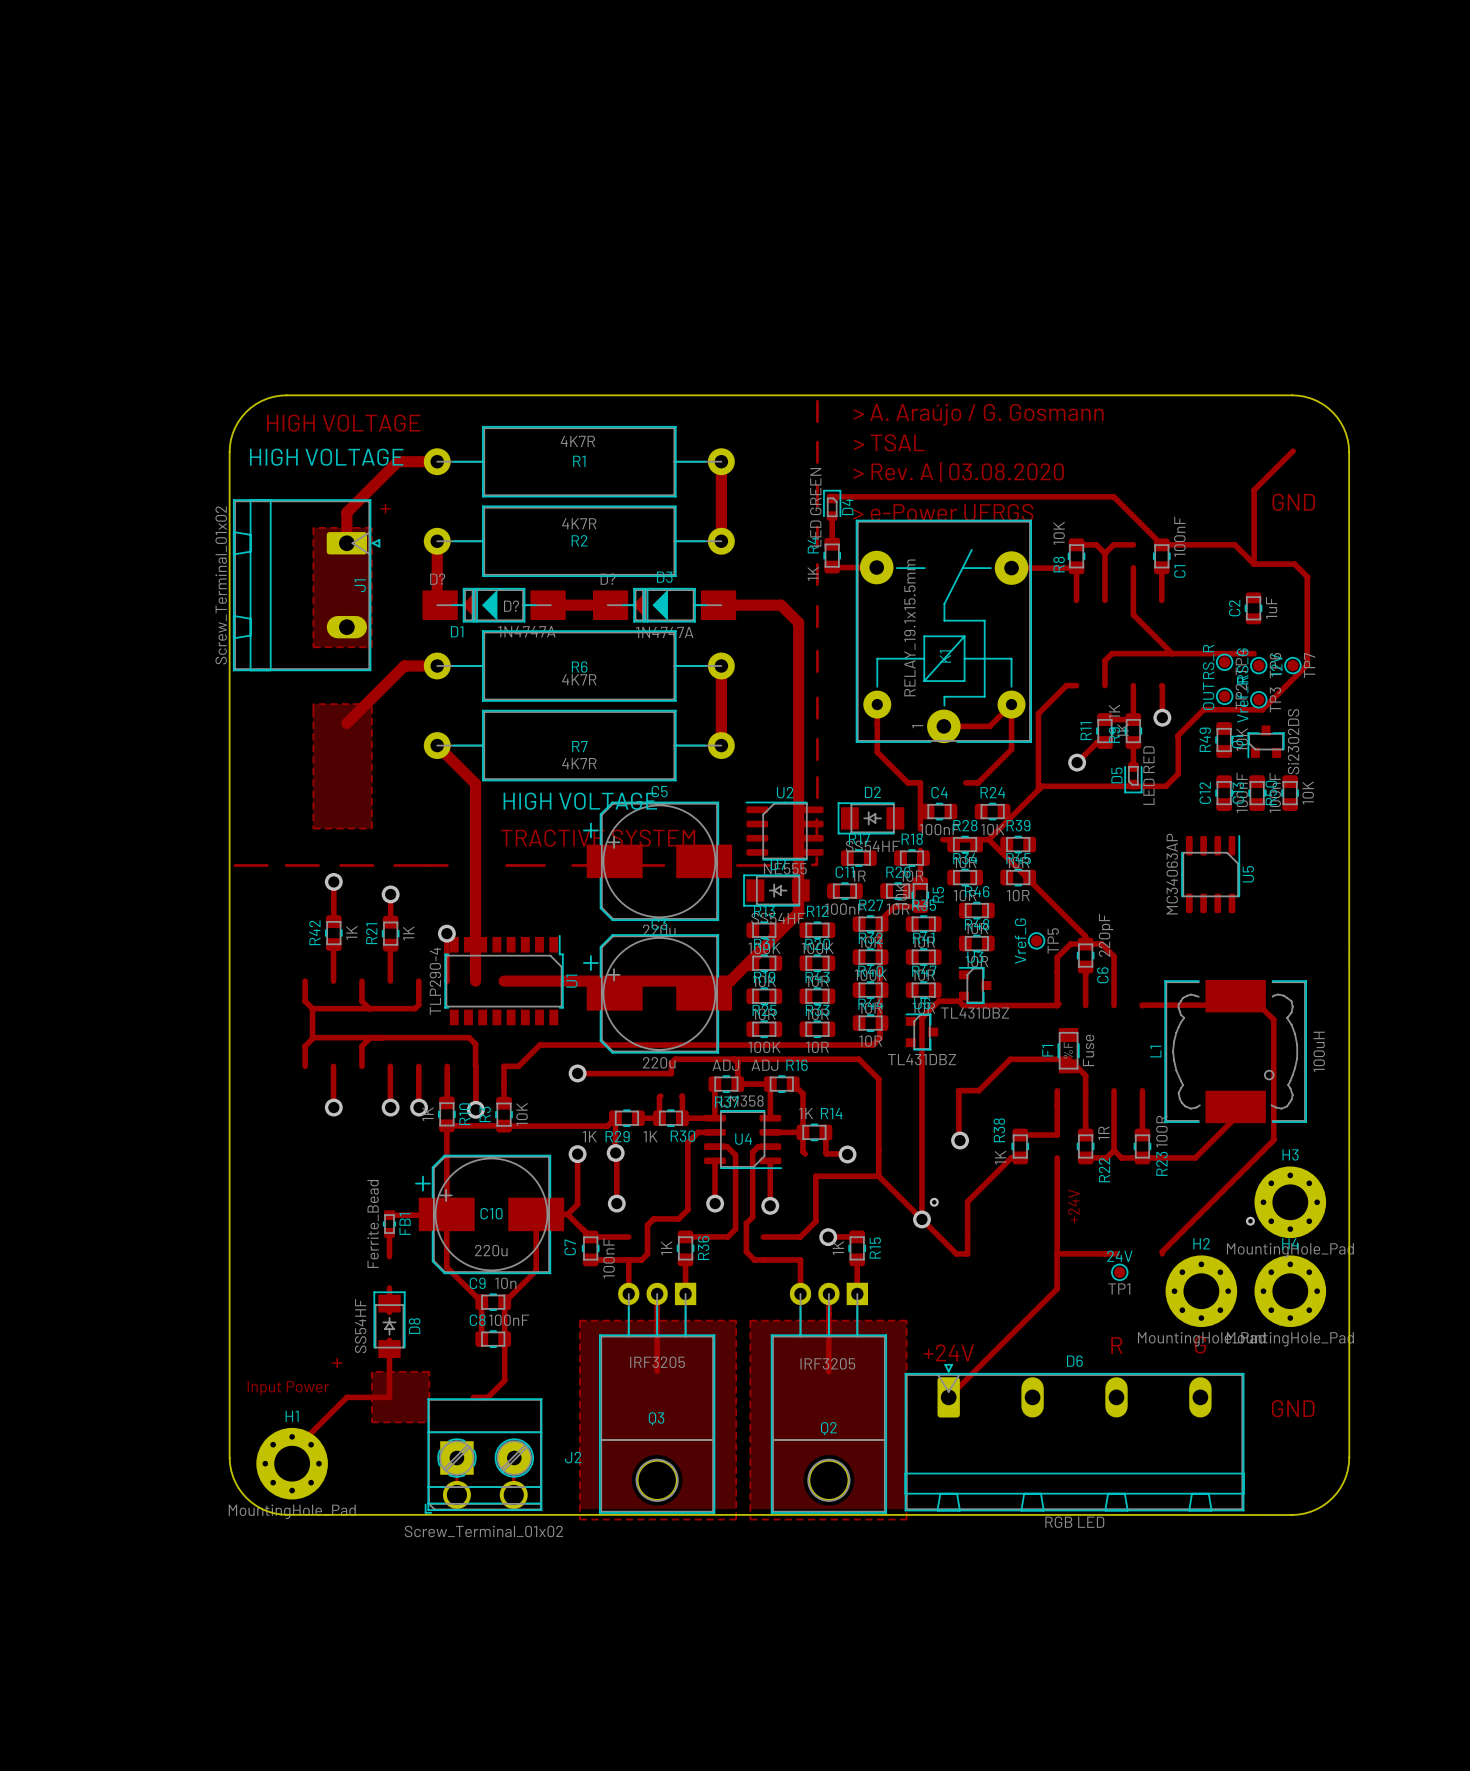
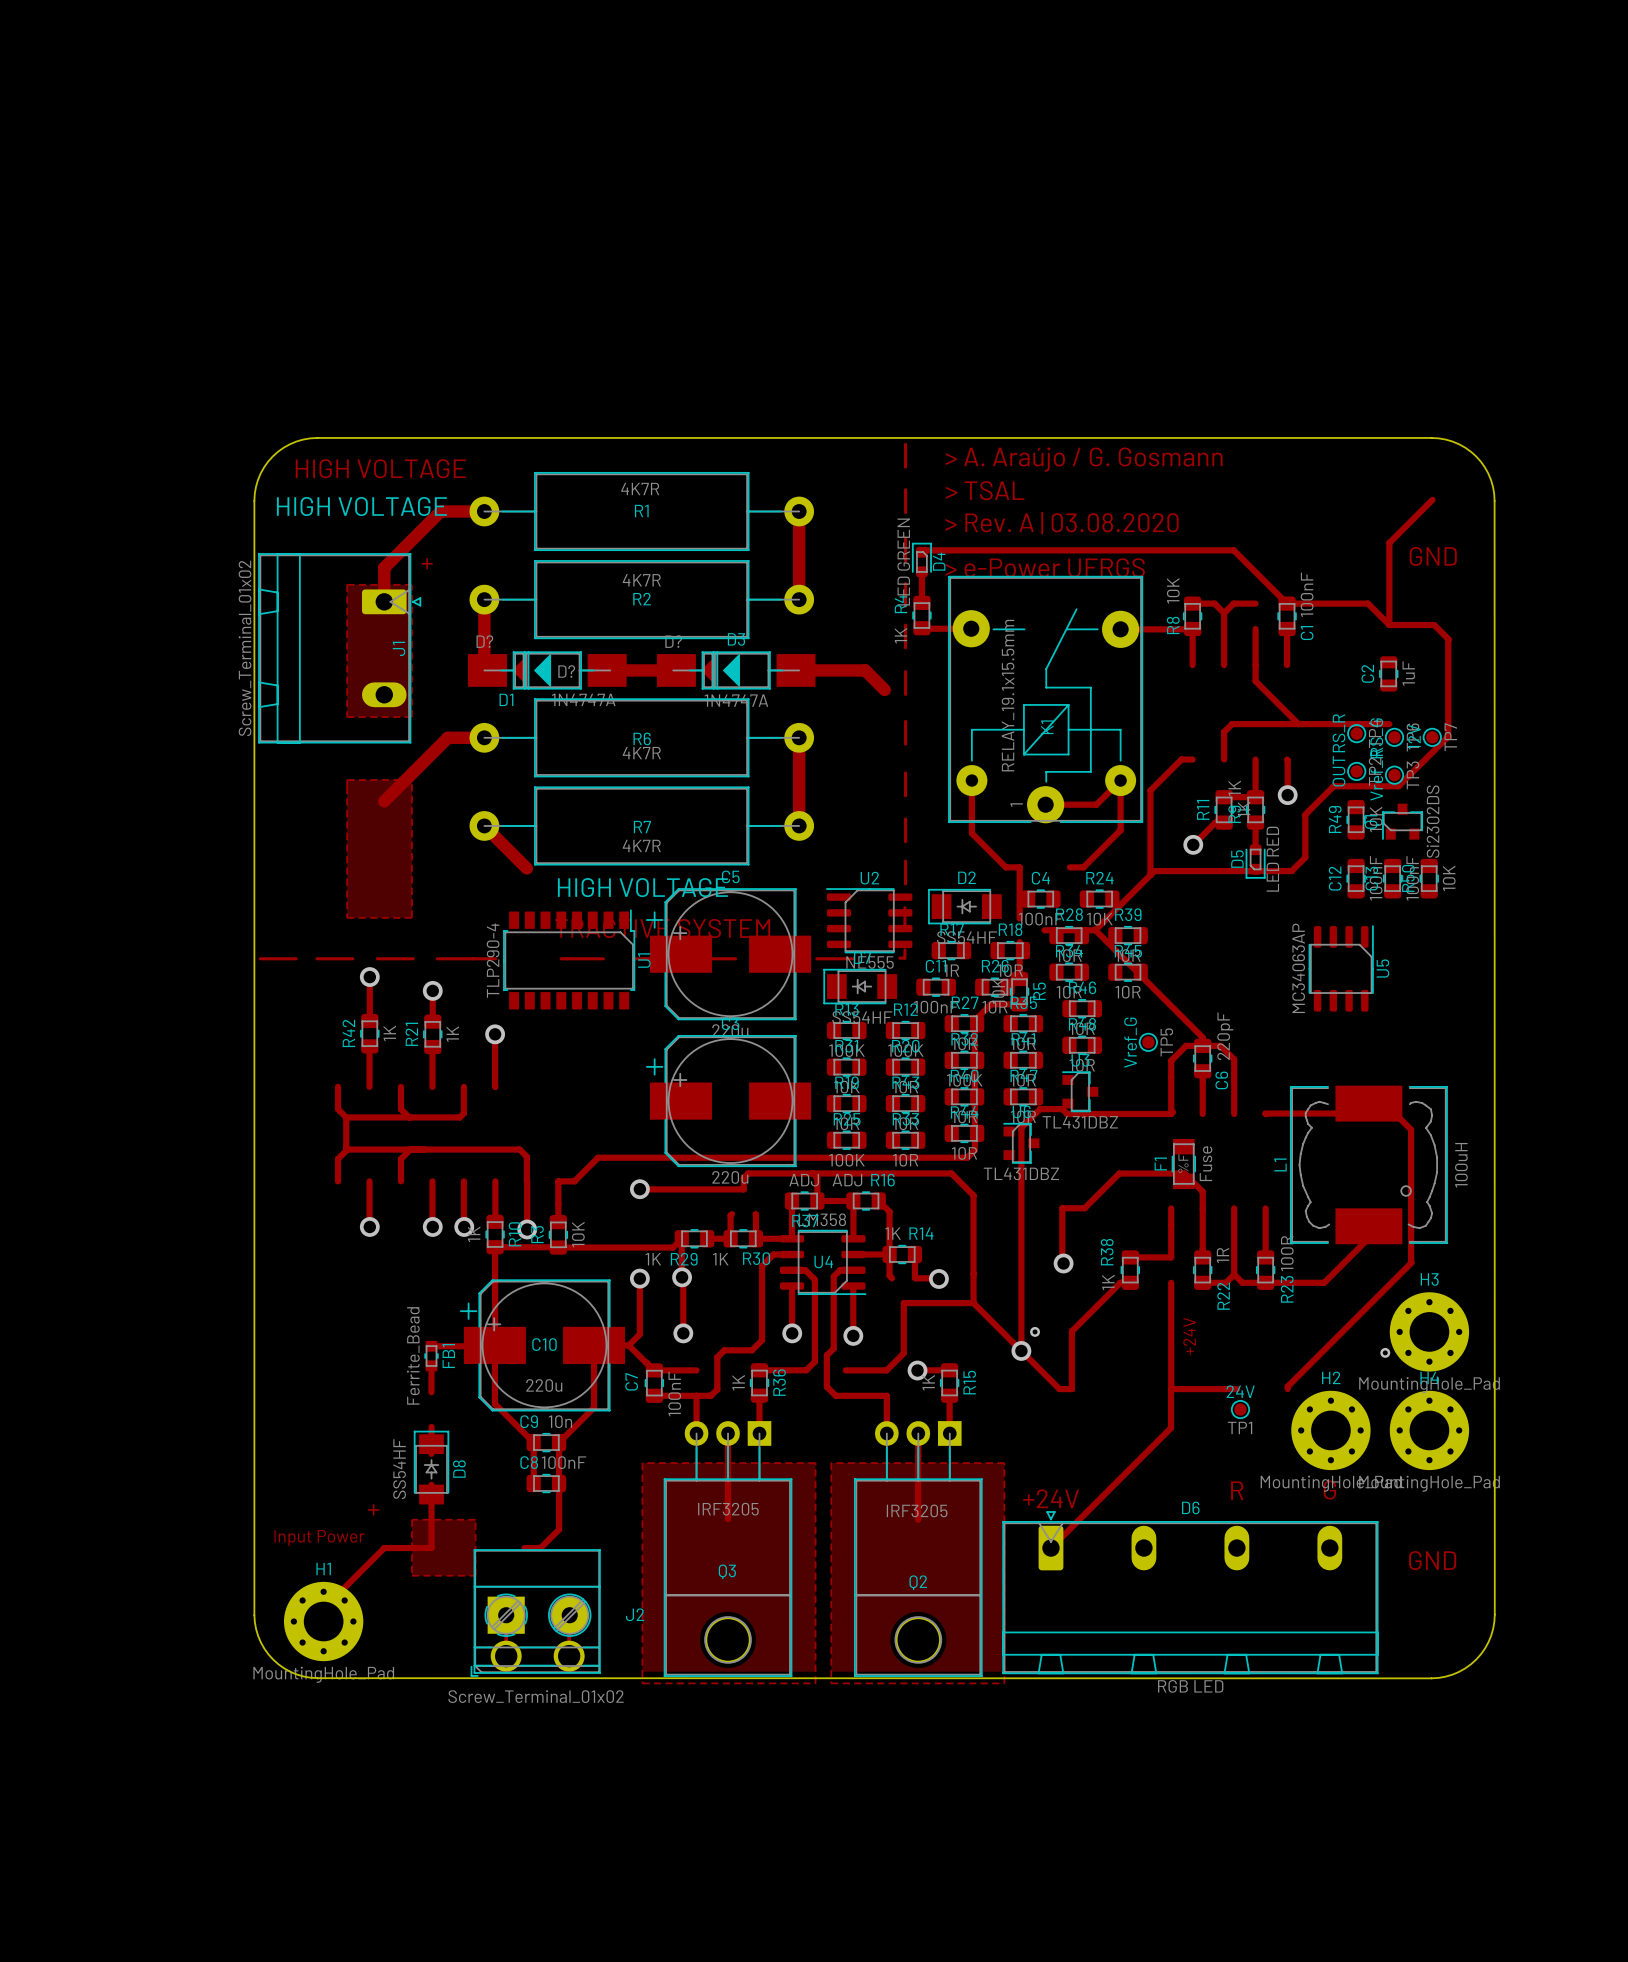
track: (798, 622) (798, 912) (730, 981) (504, 981) -> none
track: (475, 783) (475, 981) -> none
U1 position: (504, 980) -> (569, 959)

